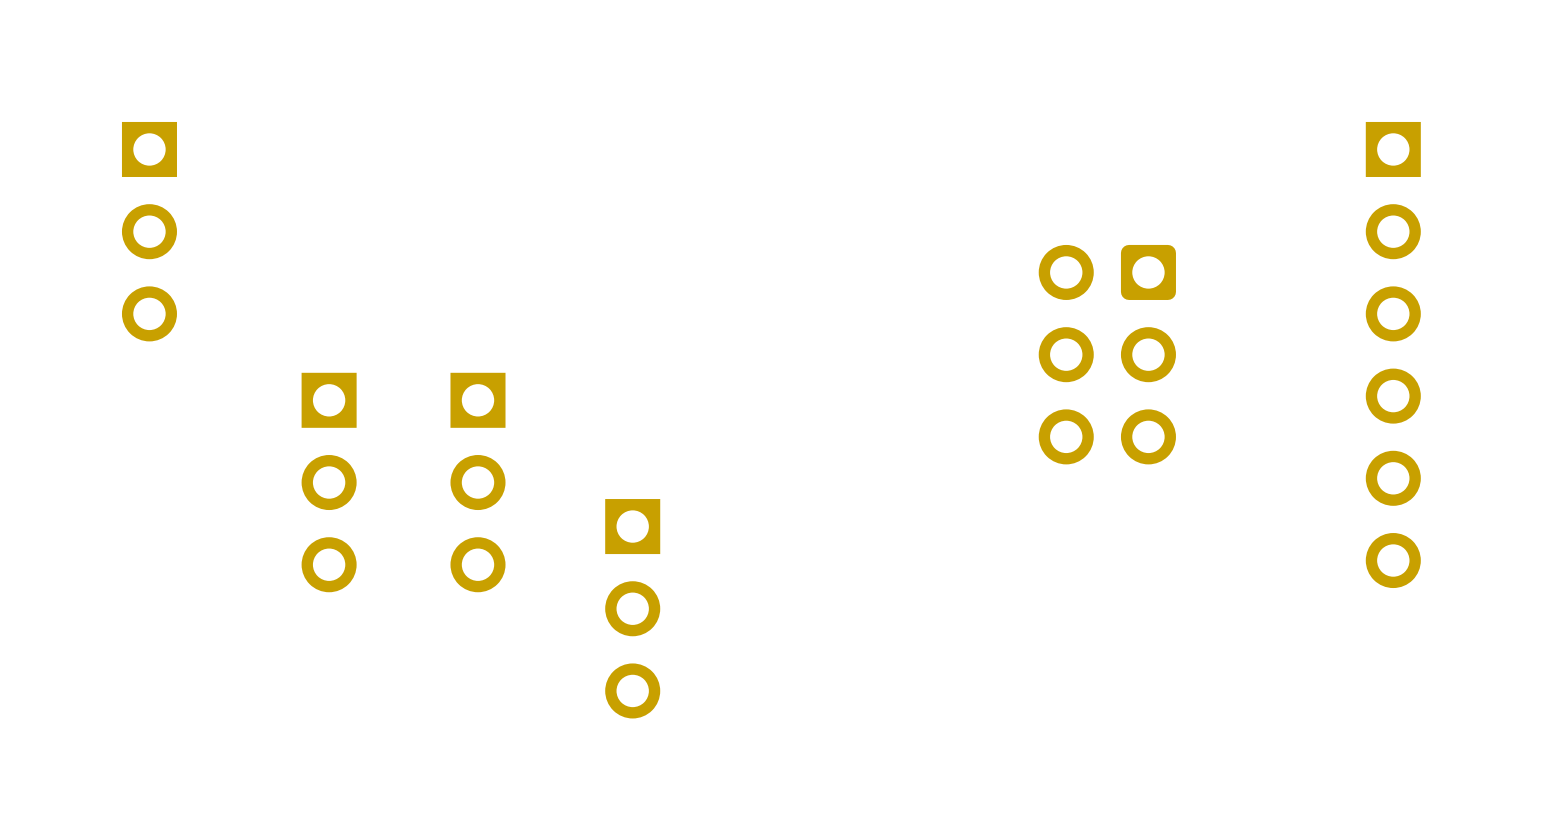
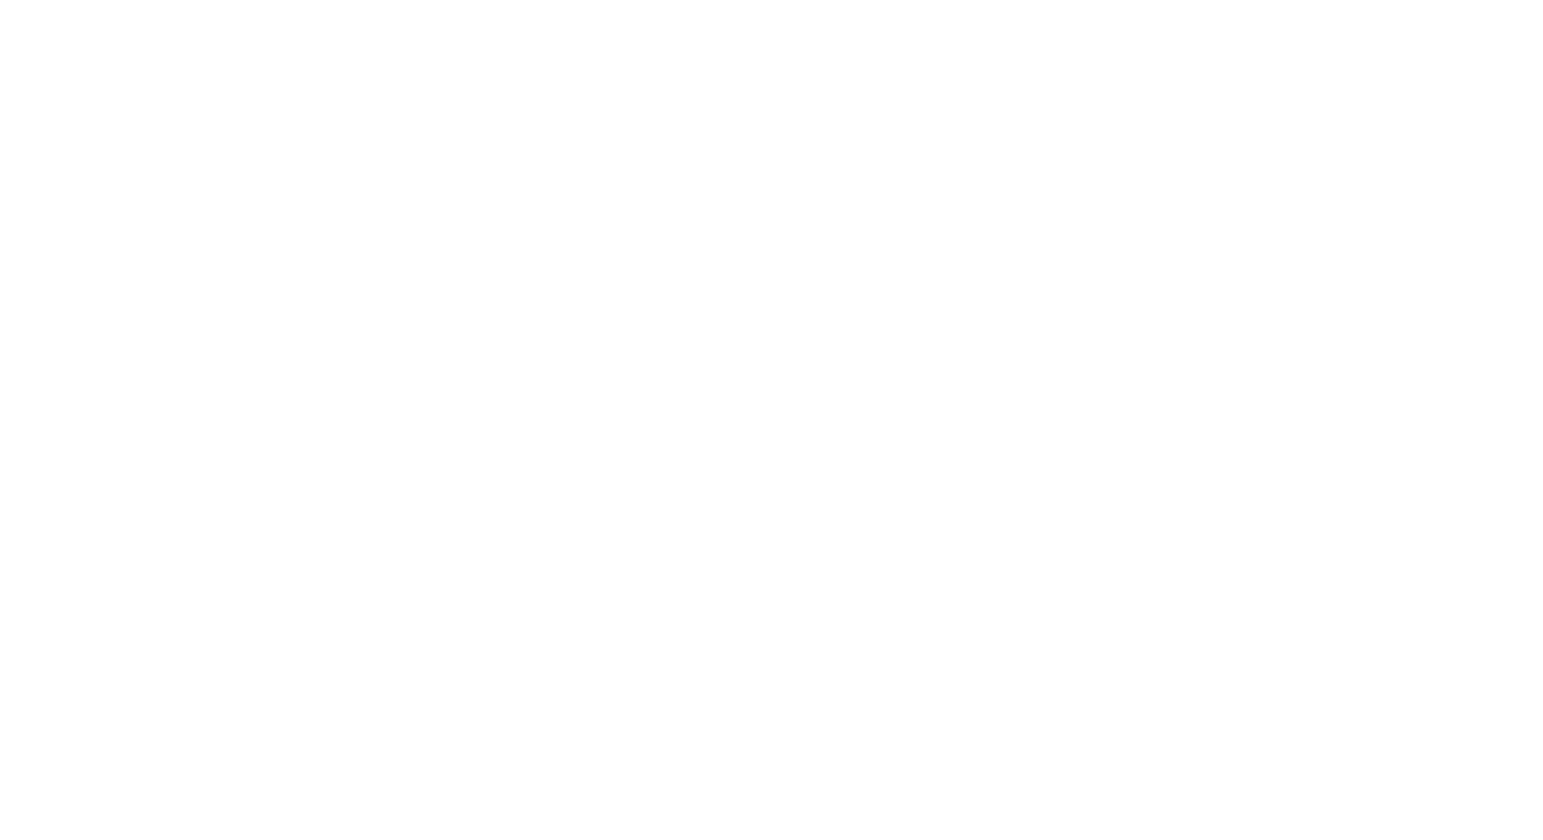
part: (149, 231) -> none
part: (1107, 354) -> none
part: (1393, 355) -> none
part: (329, 482) -> none
part: (477, 482) -> none
part: (632, 608) -> none

